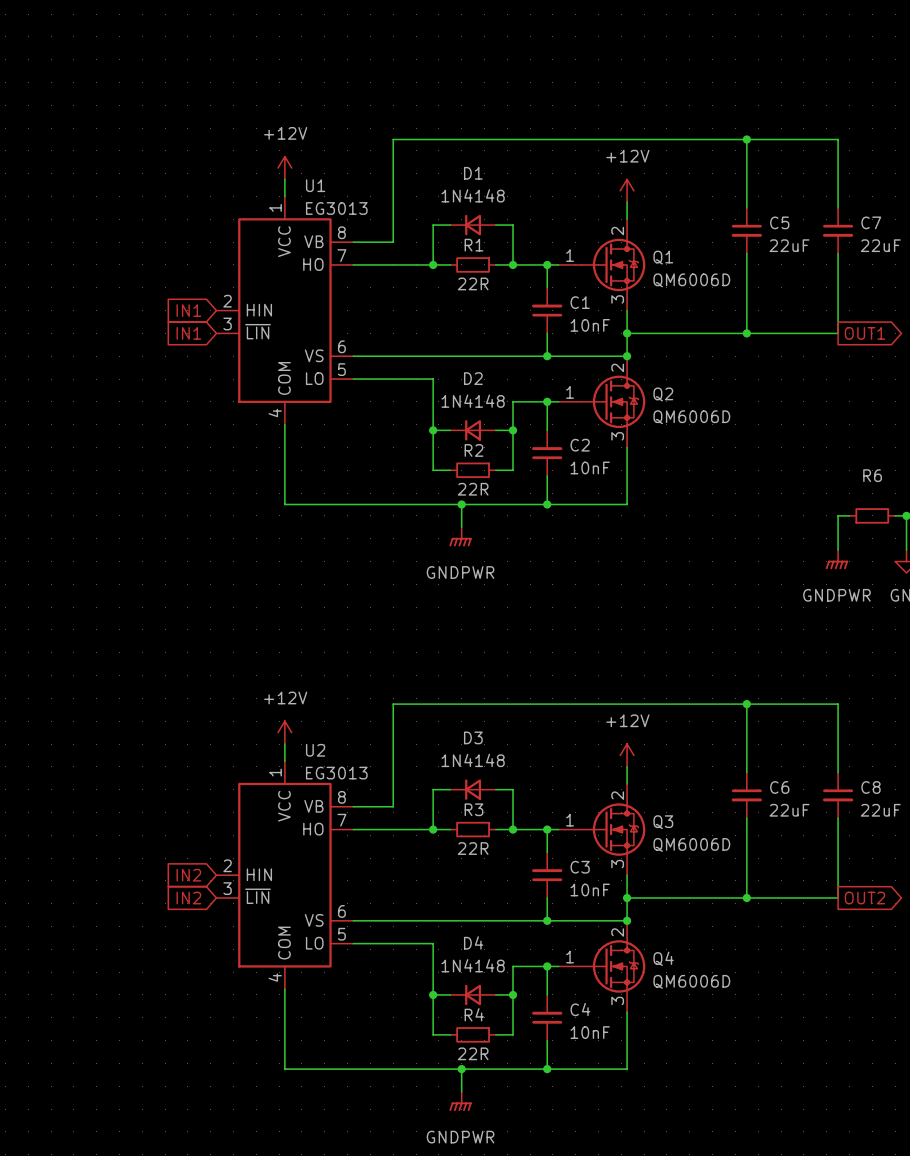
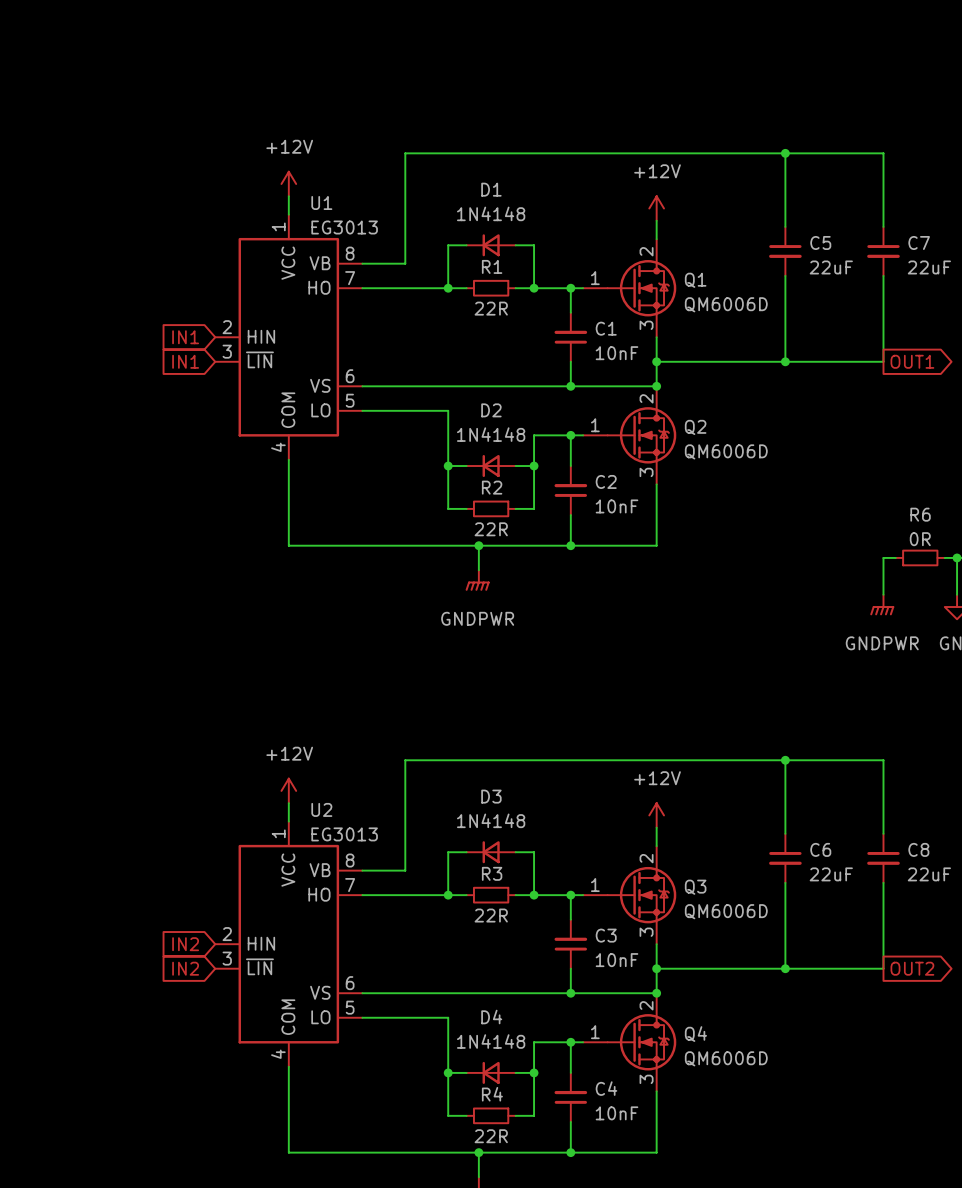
R6 value: none -> 0R (920, 539)

